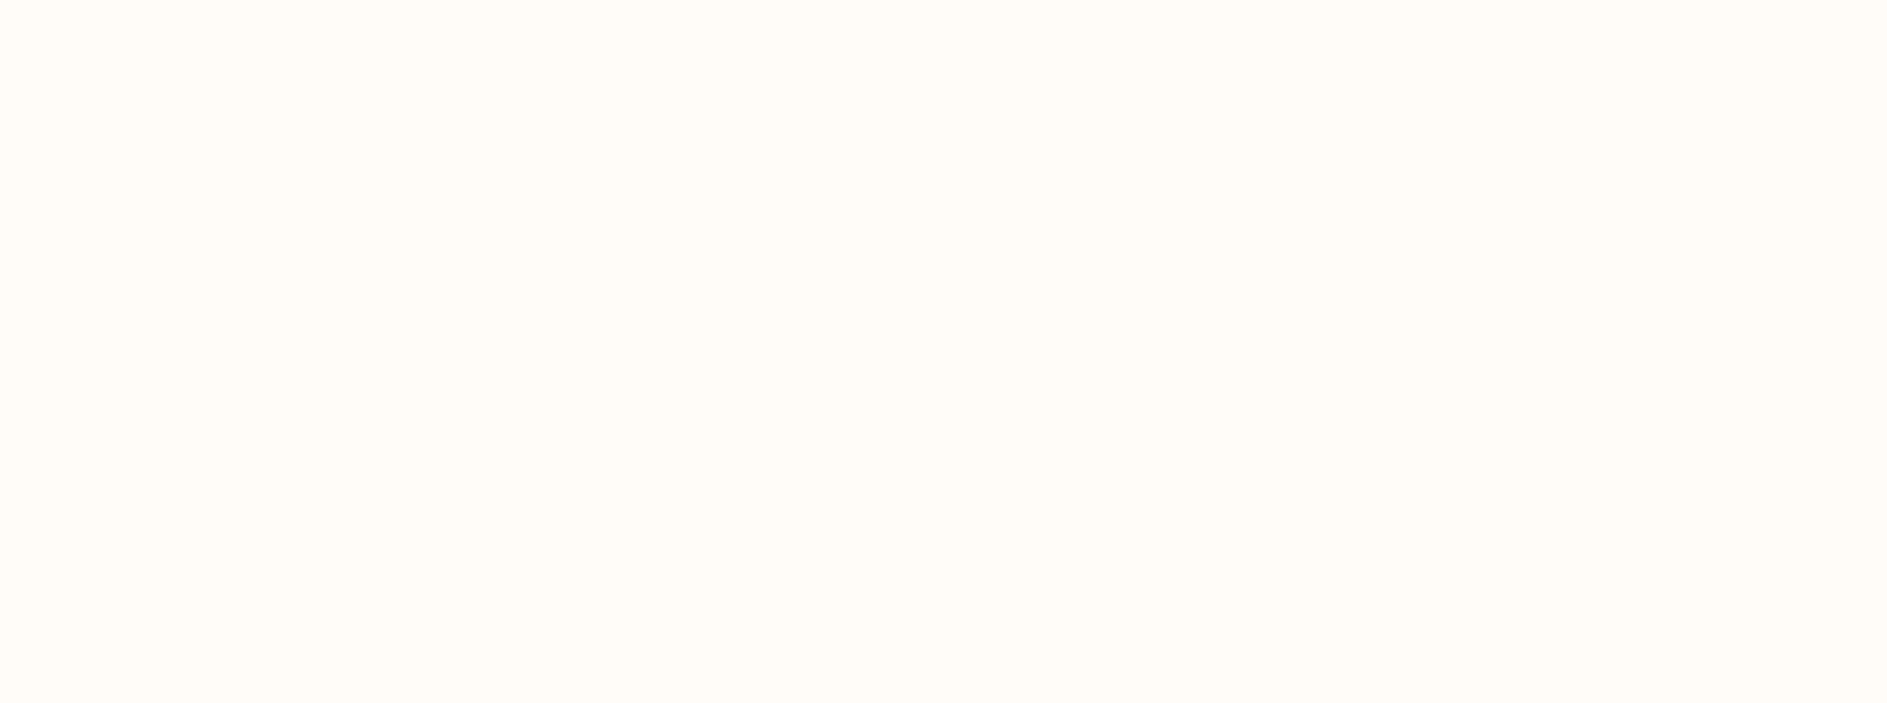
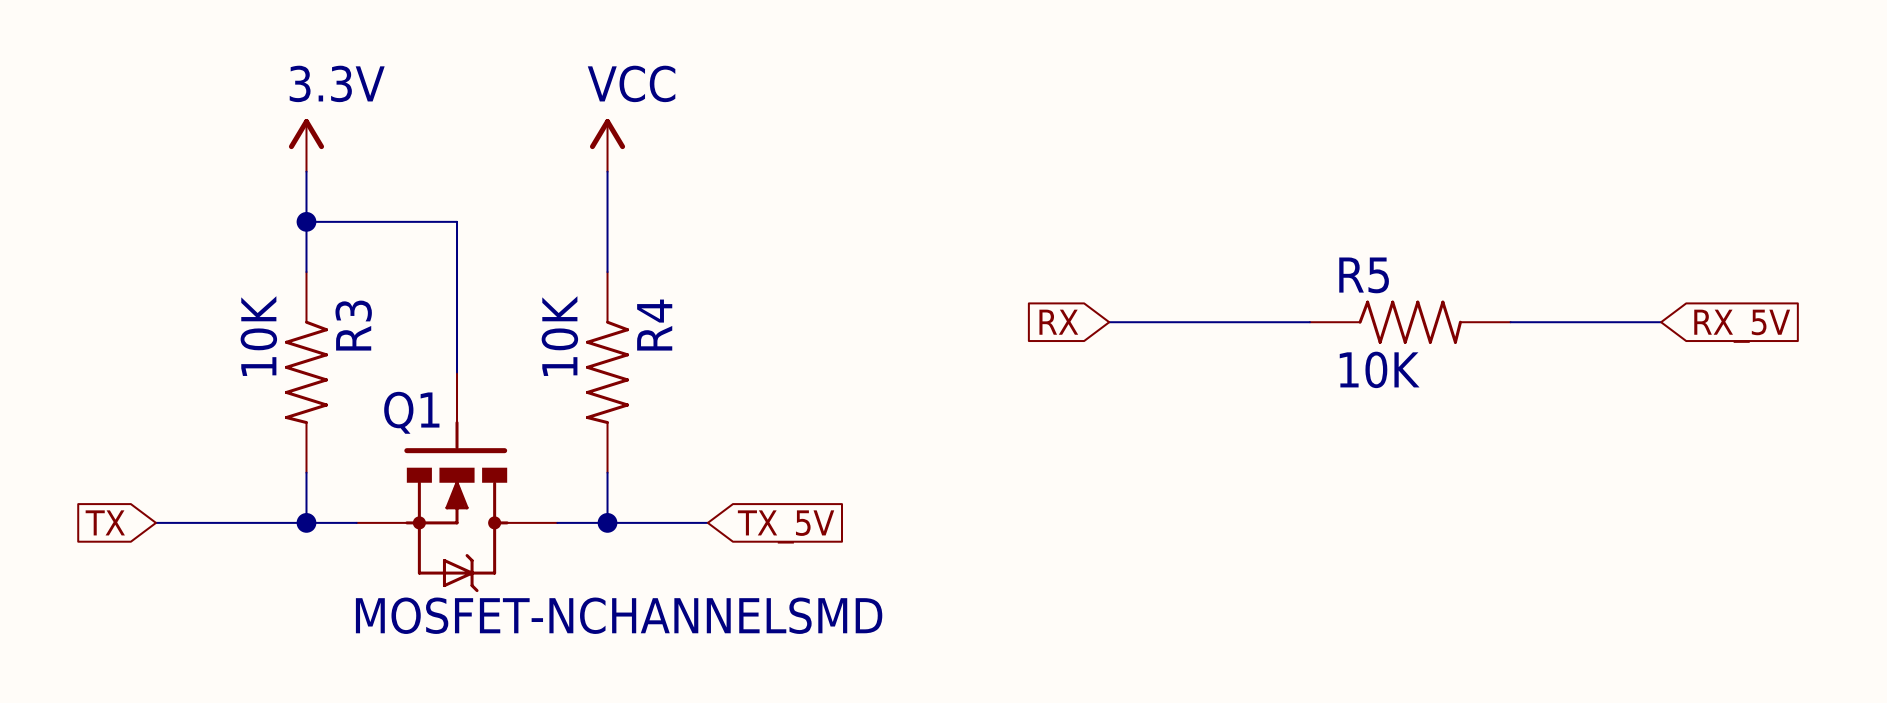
power symbol: none -> 3.3V (306, 145)
power symbol: none -> VCC (607, 145)
wire: none -> (306, 171) (306, 272)
wire: none -> (607, 171) (607, 272)
wire: none -> (306, 221) (457, 221) (457, 372)
junction: none -> (306, 221)
global label: none -> RX (1058, 322)
wire: none -> (1109, 322) (1309, 322)
R5: none -> 10K (1410, 322)
wire: none -> (1510, 322) (1661, 322)
global label: none -> RX_5V (1742, 326)
R3: none -> 10K (306, 372)
R4: none -> 10K (607, 372)
wire: none -> (306, 472) (306, 522)
wire: none -> (607, 472) (607, 522)
Q1: none -> MOSFET-NCHANNELSMD (457, 482)
global label: none -> TX (105, 522)
wire: none -> (155, 522) (356, 522)
junction: none -> (306, 522)
wire: none -> (557, 522) (707, 522)
junction: none -> (607, 522)
global label: none -> TX_5V (786, 526)

